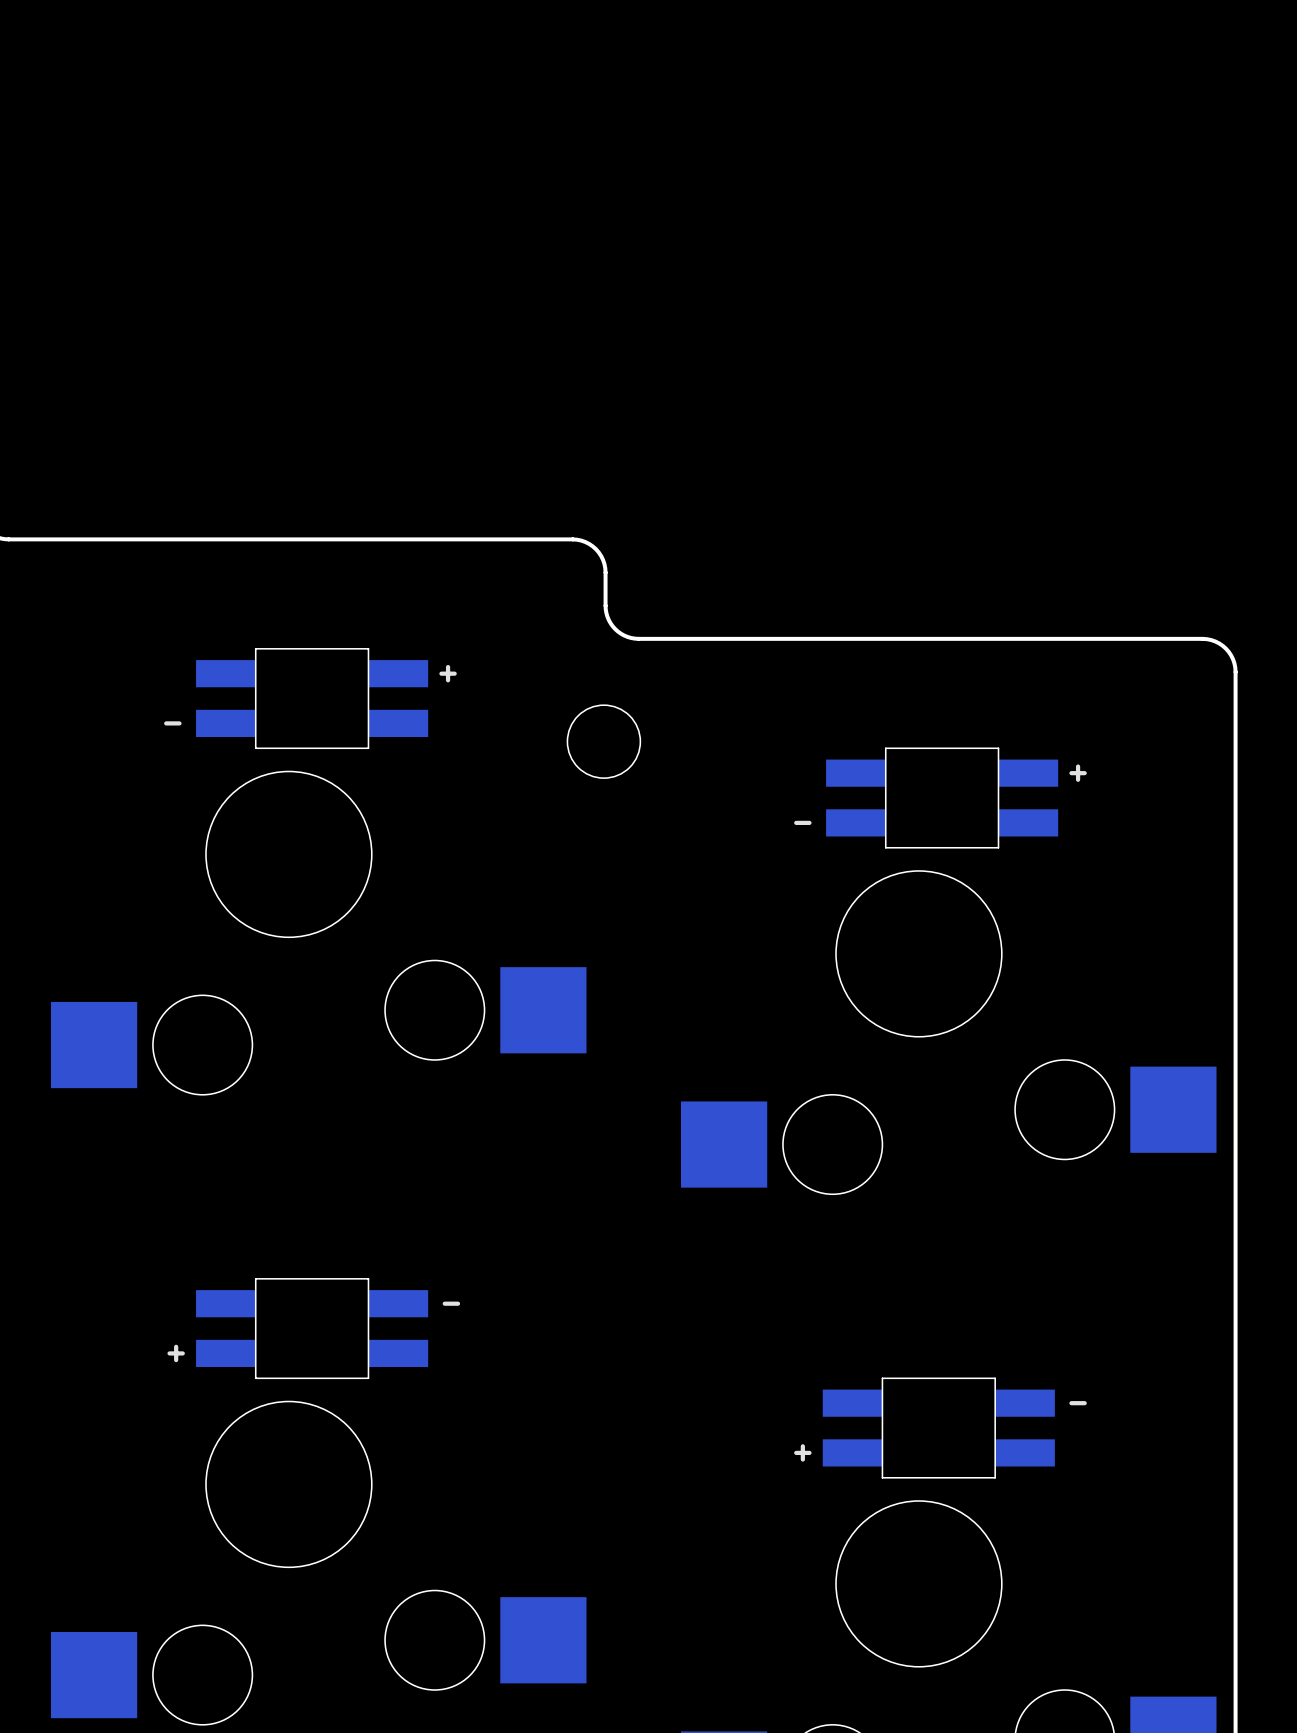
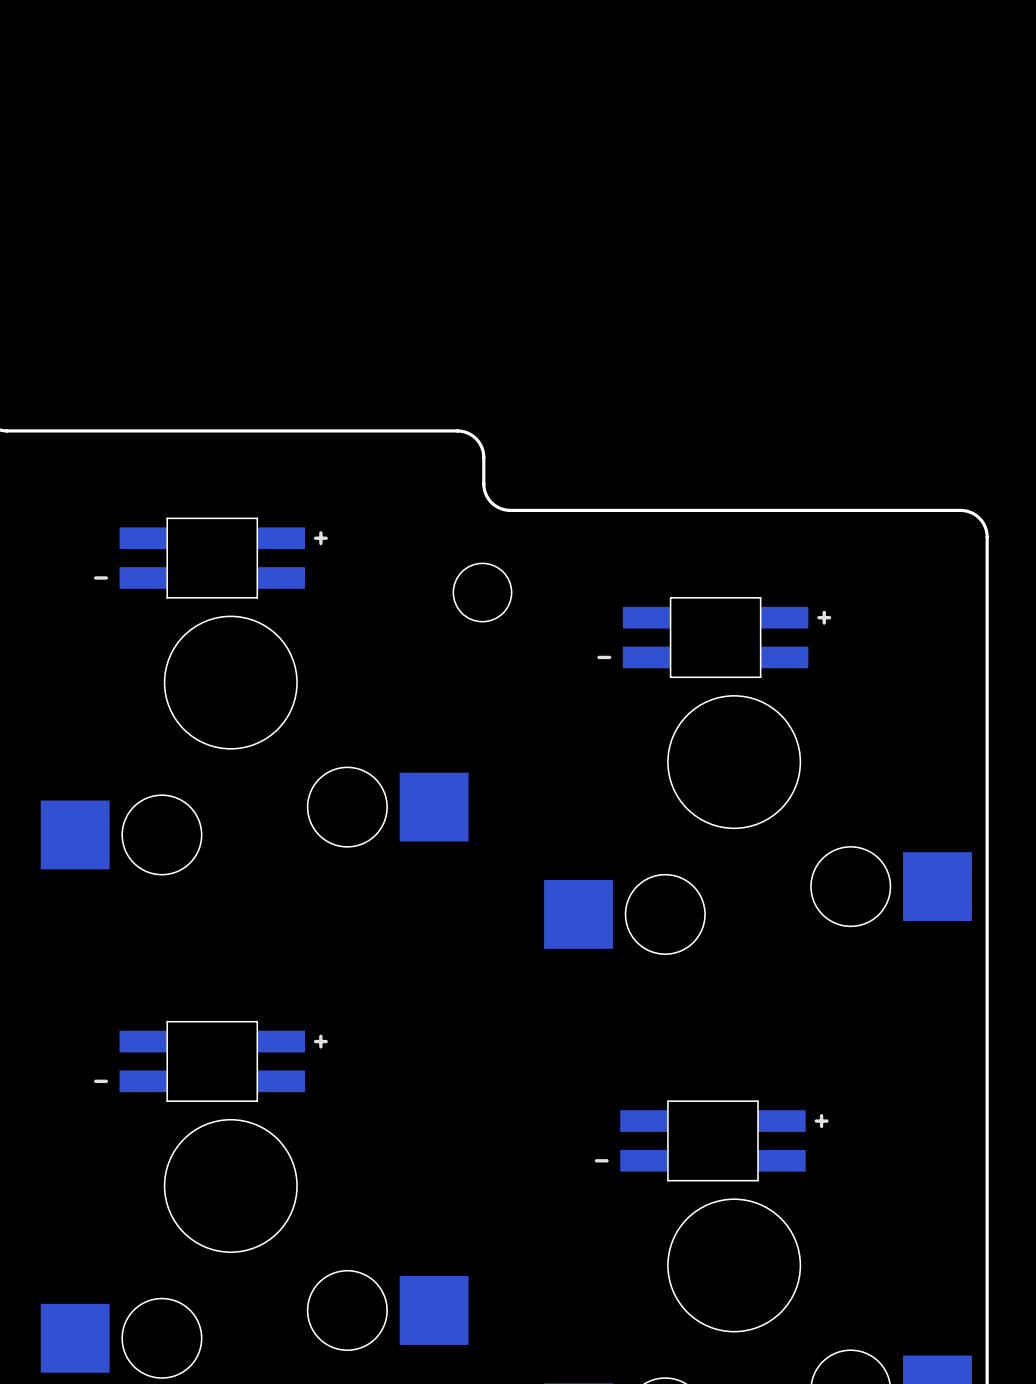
part position: (310, 698) -> (210, 558)
part position: (940, 798) -> (714, 637)
part rotation: 0° (313, 1328) -> 180° (210, 1061)
part rotation: 0° (940, 1428) -> 180° (711, 1140)

